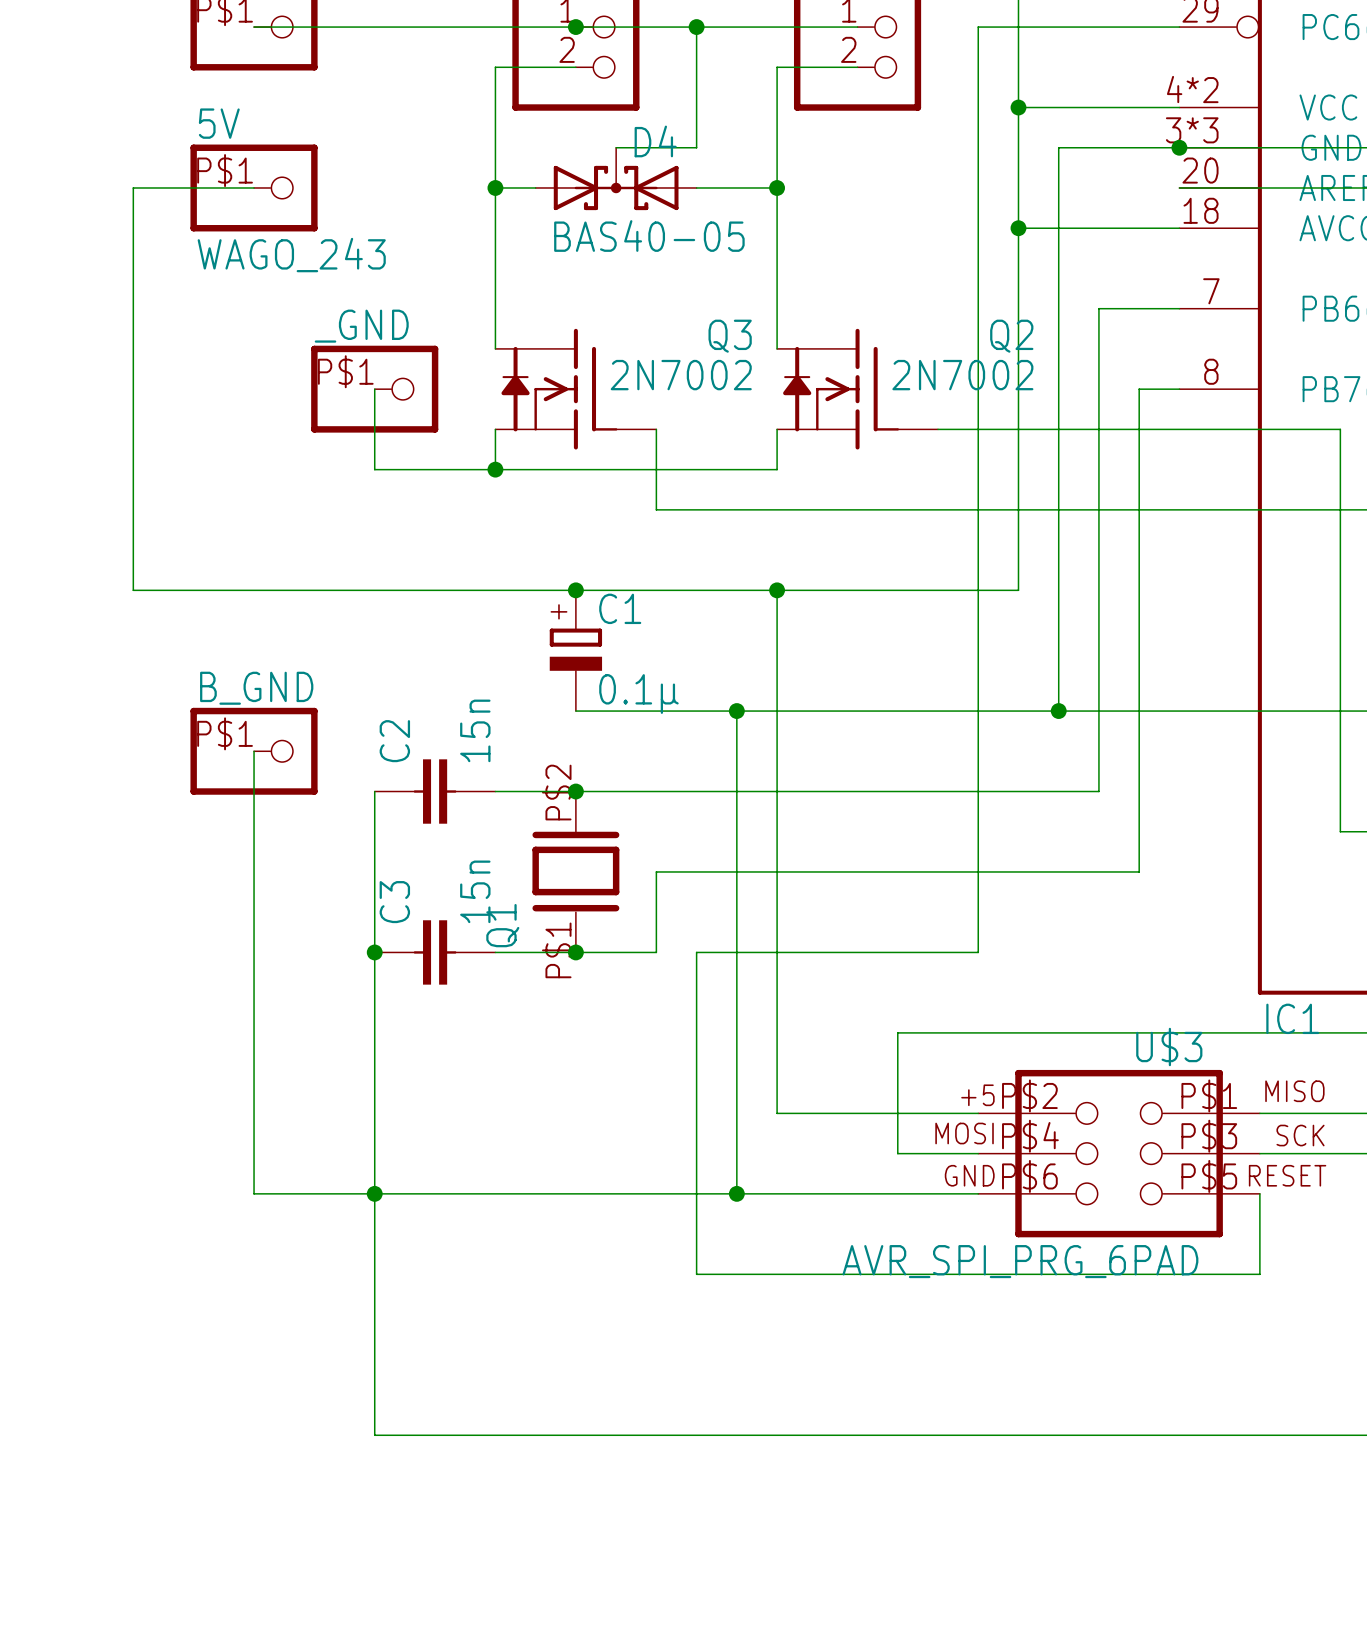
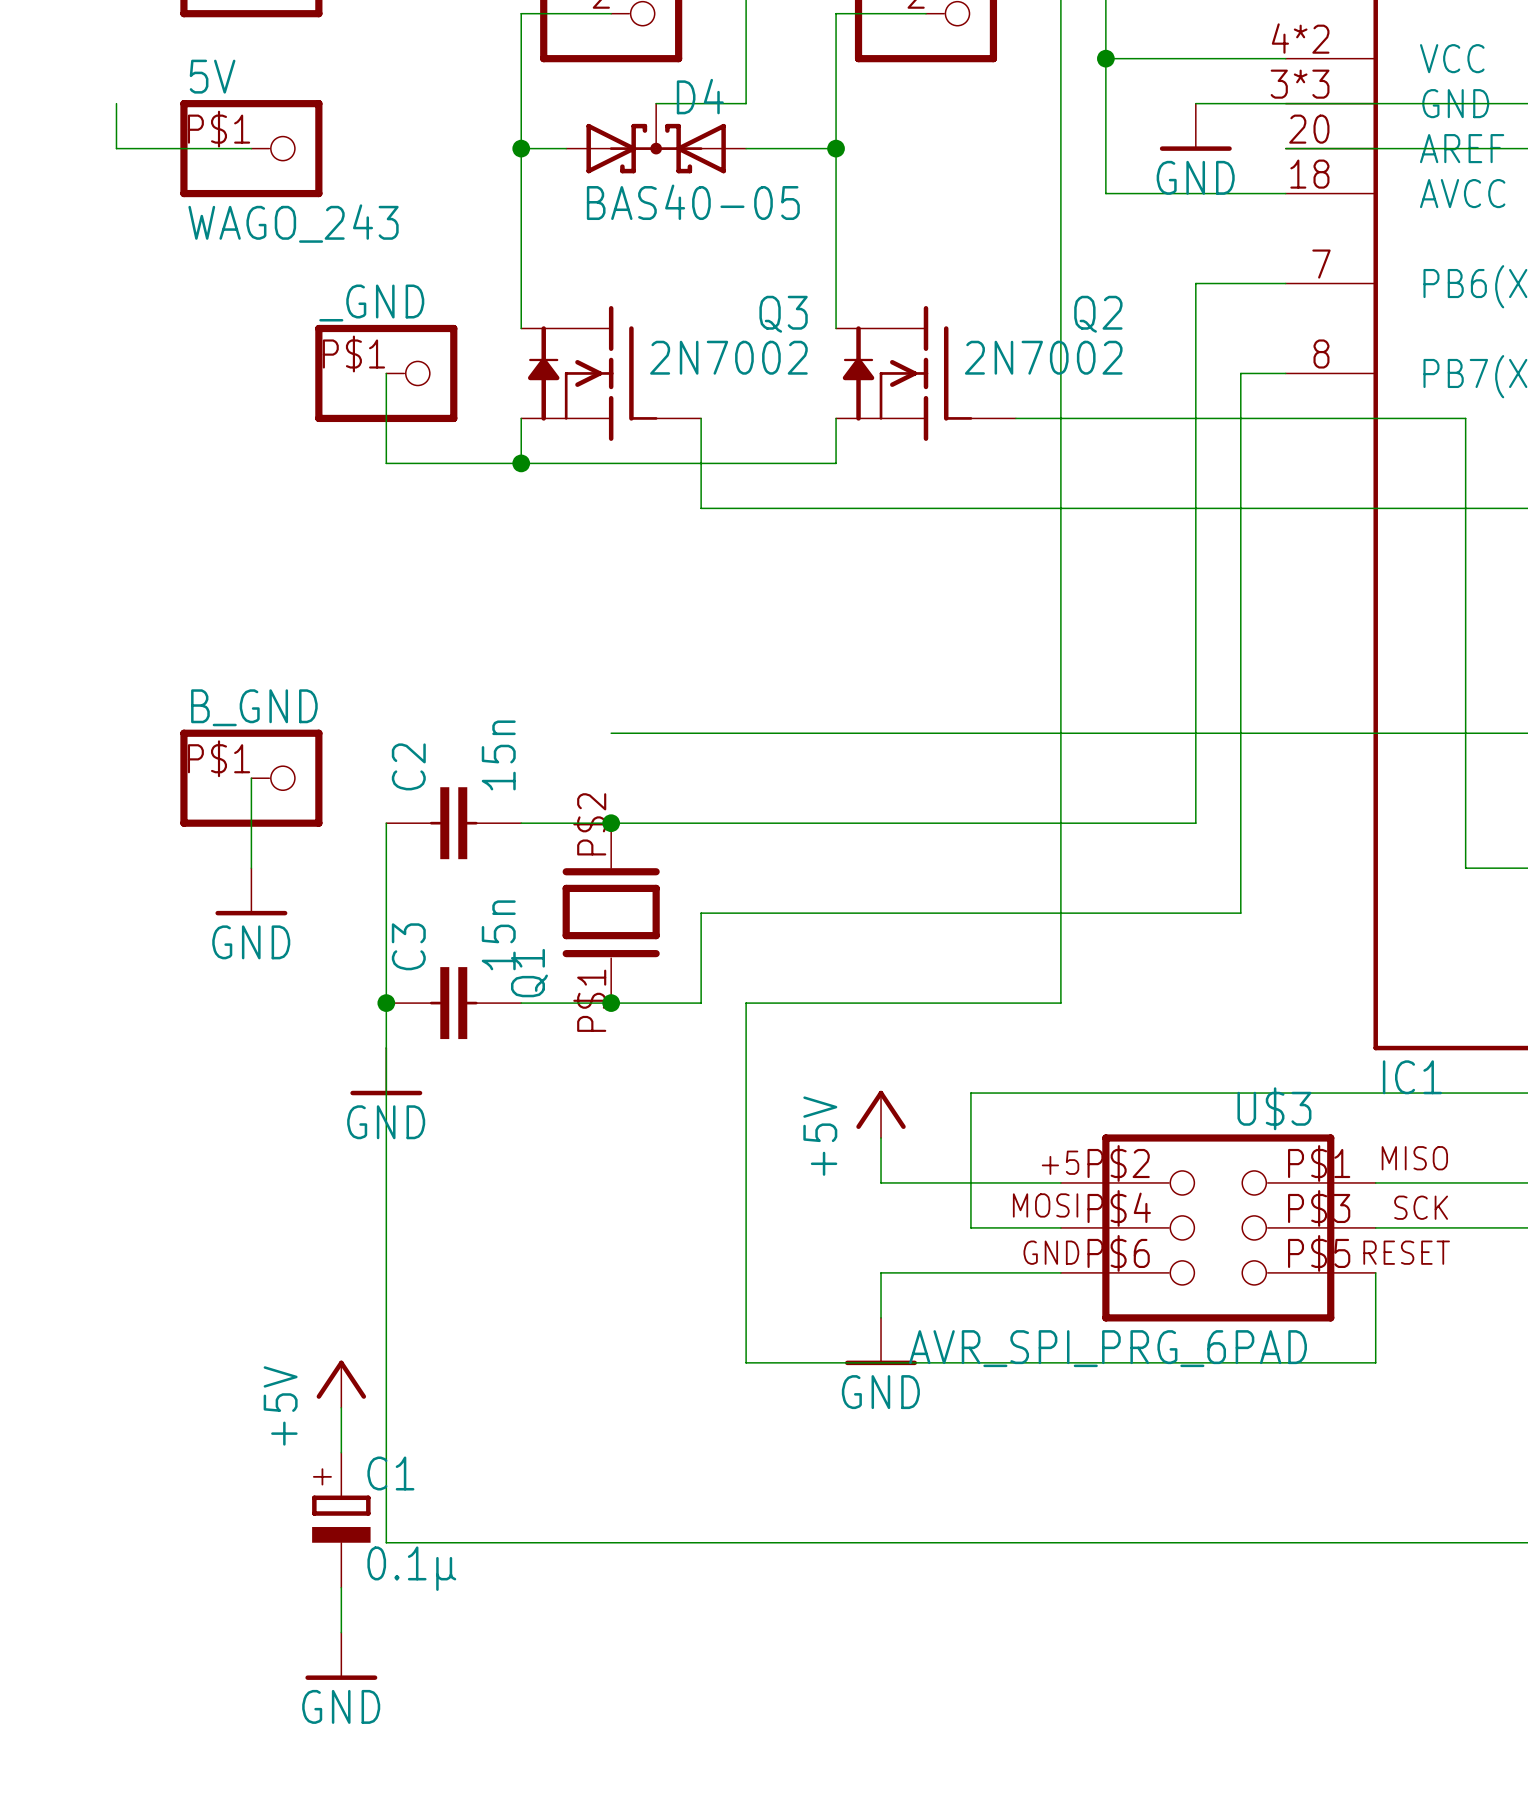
wire: (1098, 147) (1058, 147) (1058, 711) -> none
junction: (1179, 147) -> none
power symbol: none -> GND (1195, 127)
wire: (133, 187) (133, 590) (1018, 590) (1018, 228) -> (116, 148) (116, 103)
junction: (1018, 228) -> none
junction: (575, 590) -> none
wire: (777, 590) (777, 1113) (817, 1113) -> (881, 1138) (881, 1182)
junction: (777, 590) -> none
C1 position: (575, 650) -> (341, 1520)
wire: (736, 711) (736, 1193) -> none
junction: (736, 711) -> none
junction: (1058, 711) -> none
wire: (254, 831) (254, 1193) (817, 1193) -> (881, 1317) (881, 1272)
power symbol: none -> GND (251, 891)
power symbol: none -> GND (386, 1071)
power symbol: none -> +5V (881, 1114)
junction: (374, 1193) -> none
junction: (736, 1193) -> none
power symbol: none -> GND (881, 1341)
power symbol: none -> +5V (341, 1384)
wire: none -> (341, 1407) (341, 1452)
wire: none -> (341, 1587) (341, 1632)
power symbol: none -> GND (341, 1656)

